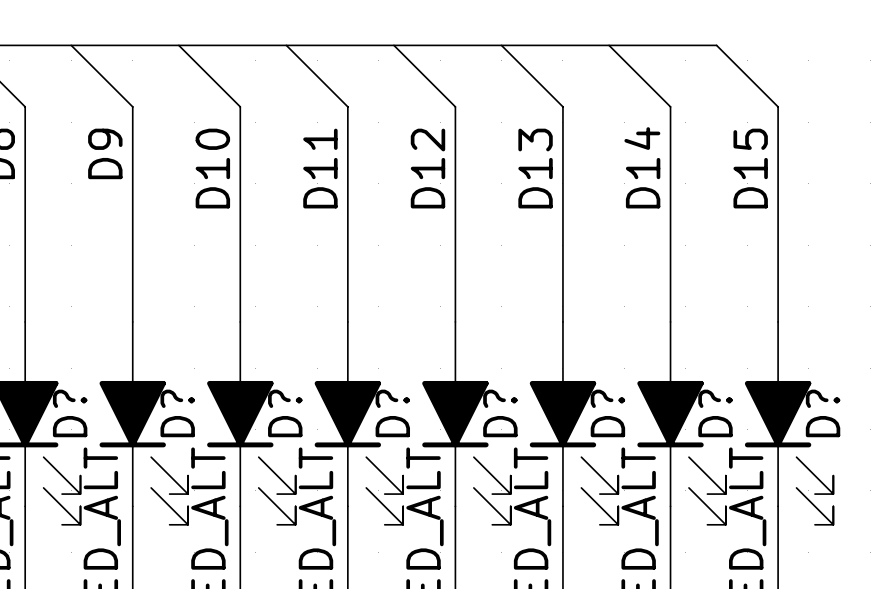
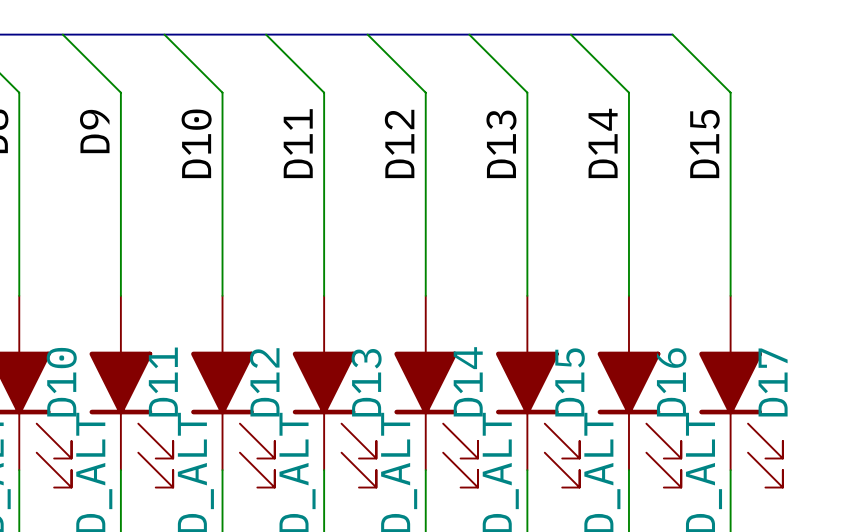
D? name: D? (70, 413) -> D10 (61, 382)
D? name: D? (177, 413) -> D11 (163, 382)
D? name: D? (285, 413) -> D12 (264, 382)
D? name: D? (392, 413) -> D13 (366, 382)
D? name: D? (500, 413) -> D14 (468, 381)
D? name: D? (607, 413) -> D15 (570, 382)
D? name: D? (715, 413) -> D16 (671, 382)
D? name: D? (823, 413) -> D17 (773, 382)

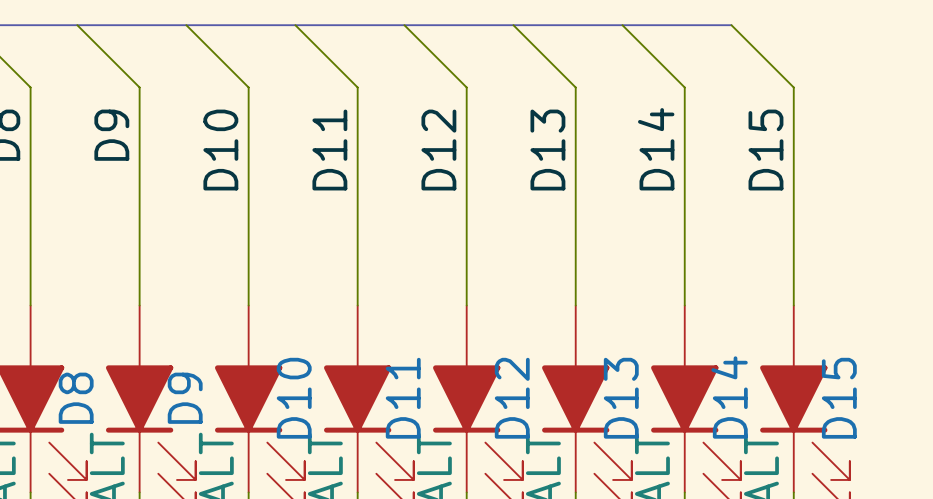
D14 name: D14 (468, 381) -> D12 (512, 398)
D10 name: D10 (61, 382) -> D8 (76, 398)
D11 name: D11 (163, 382) -> D9 (185, 398)
D12 name: D12 (264, 382) -> D10 (294, 398)
D13 name: D13 (366, 382) -> D11 (403, 398)
D15 name: D15 (570, 382) -> D13 (621, 398)
D16 name: D16 (671, 382) -> D14 (729, 397)
D17 name: D17 (773, 382) -> D15 (839, 398)

